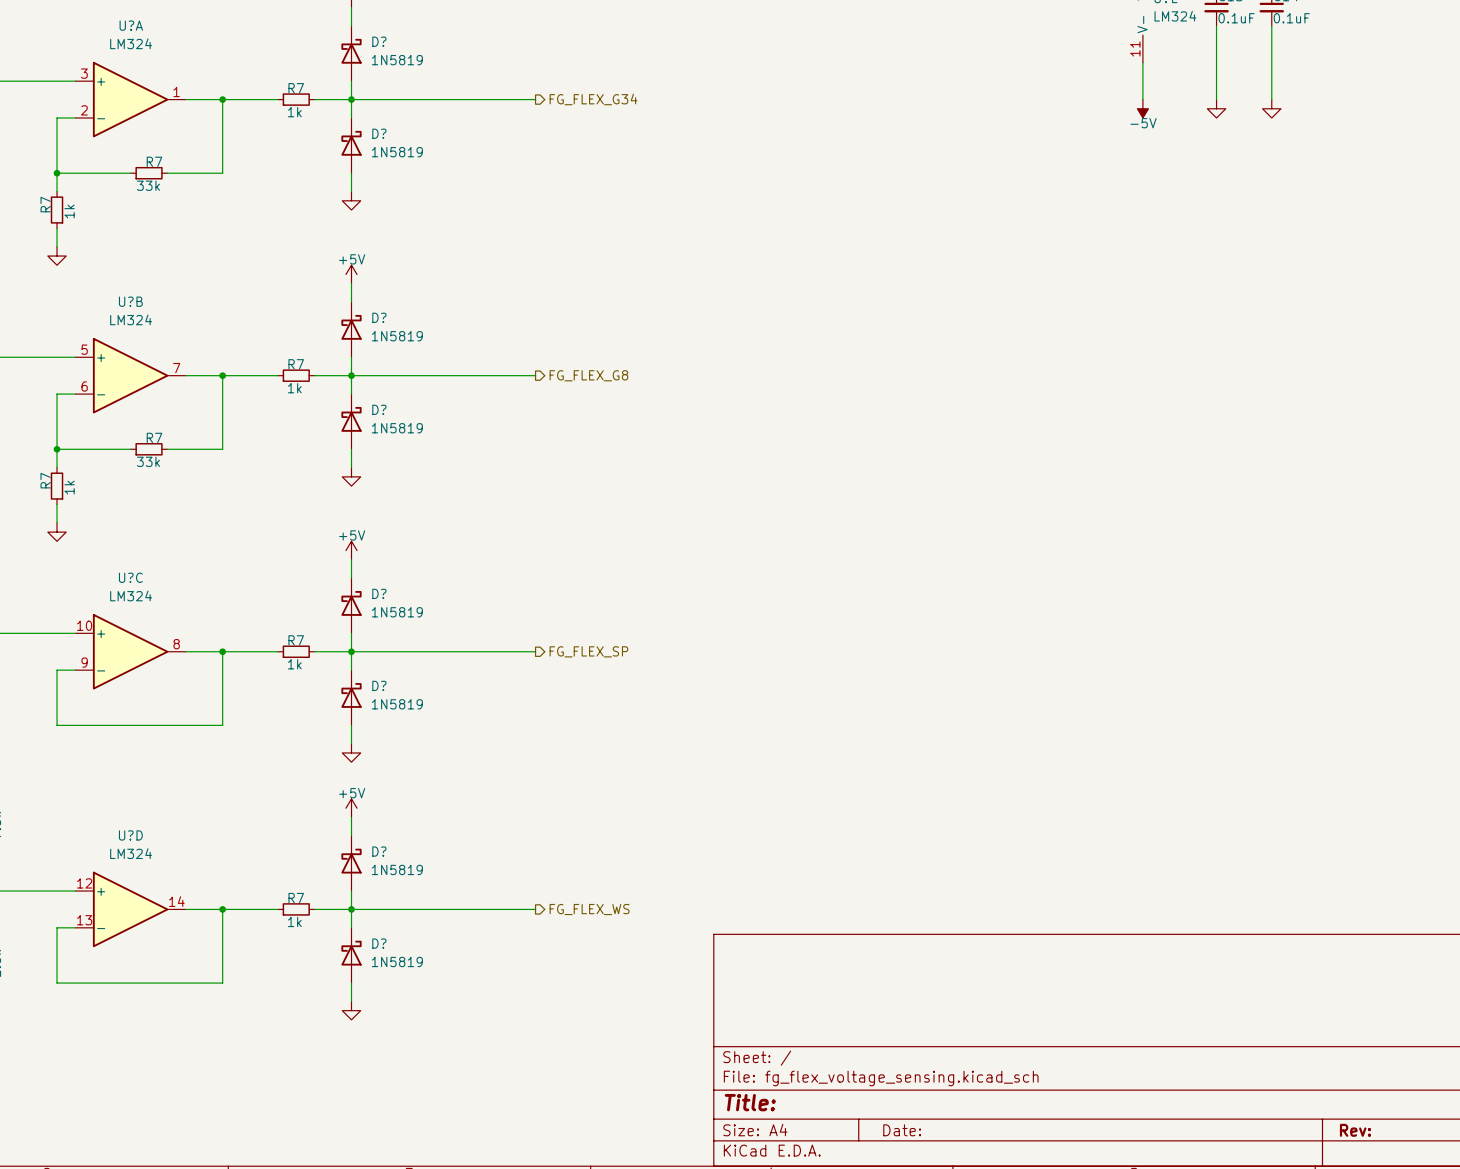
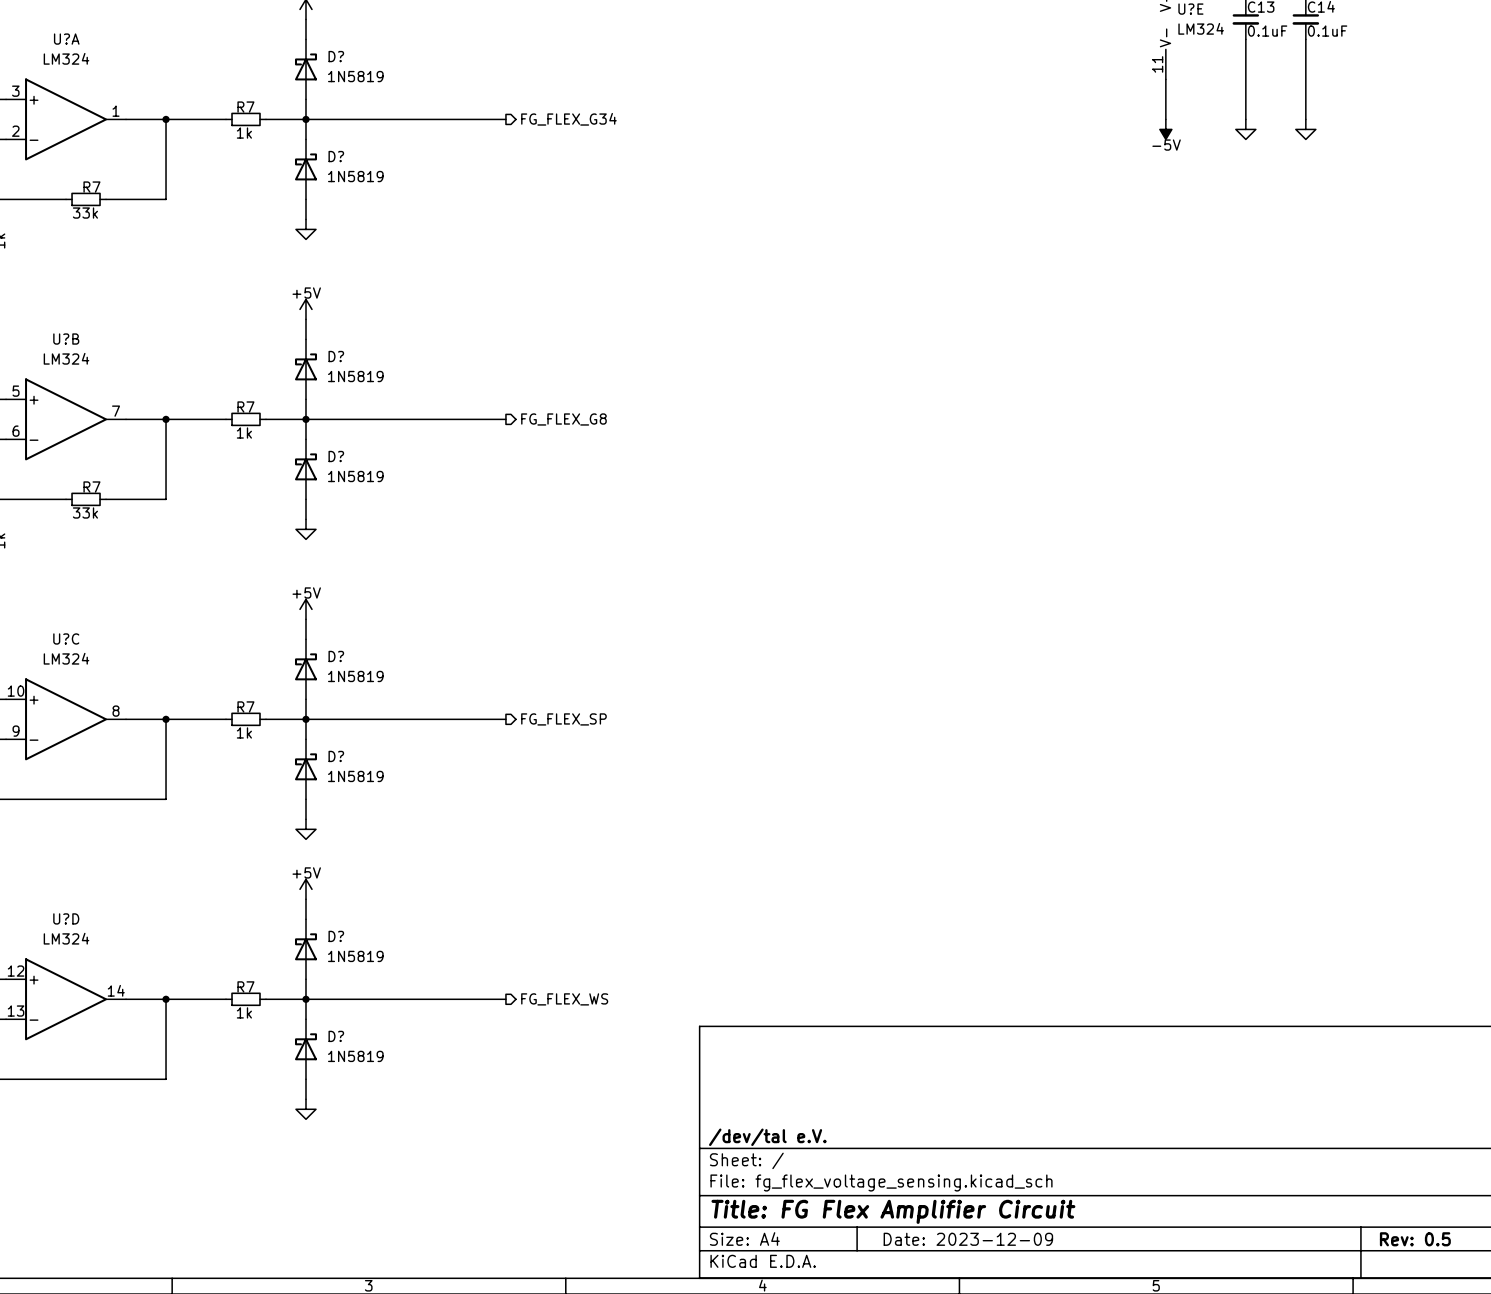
title block: none -> /dev/tal e.V. (767, 1137)
title block: Title: (750, 1102) -> Title: FG Flex Amplifier Circuit (893, 1211)
title block: Date: (902, 1130) -> Date: 2023-12-09 (968, 1239)
title block: Rev: (1355, 1130) -> Rev: 0.5 (1415, 1239)

